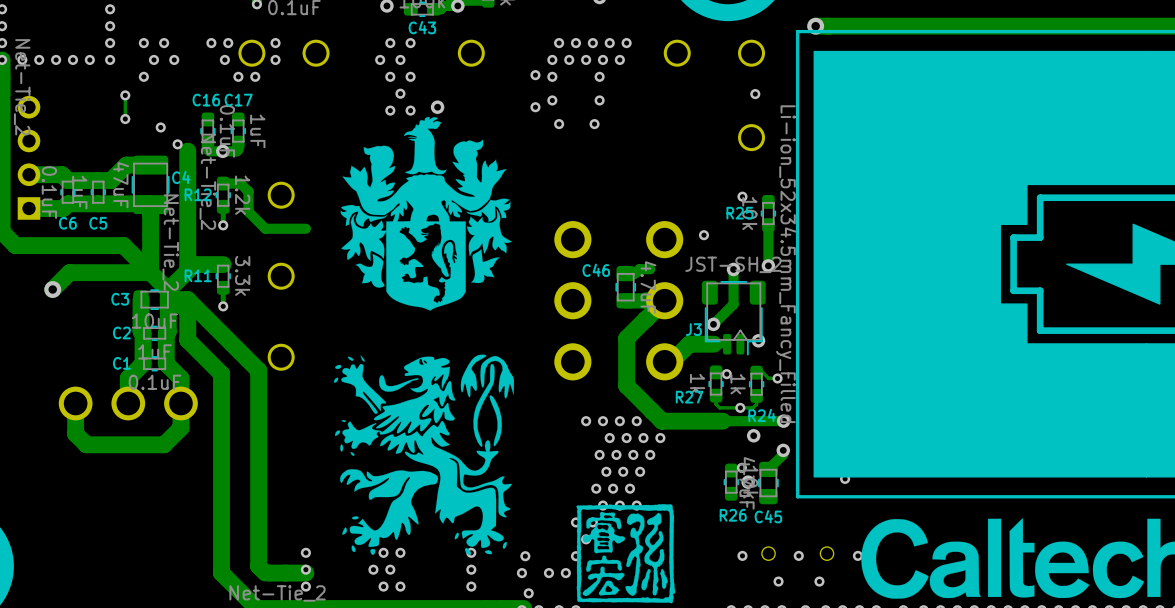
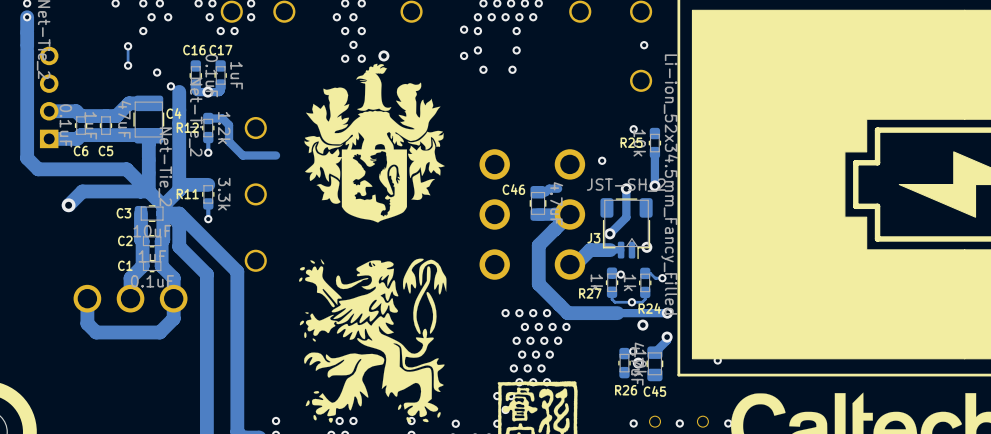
via: (22, 59) -> none
via: (39, 59) -> none
via: (56, 59) -> none
via: (72, 59) -> none
via: (89, 59) -> none
via: (110, 59) -> none

